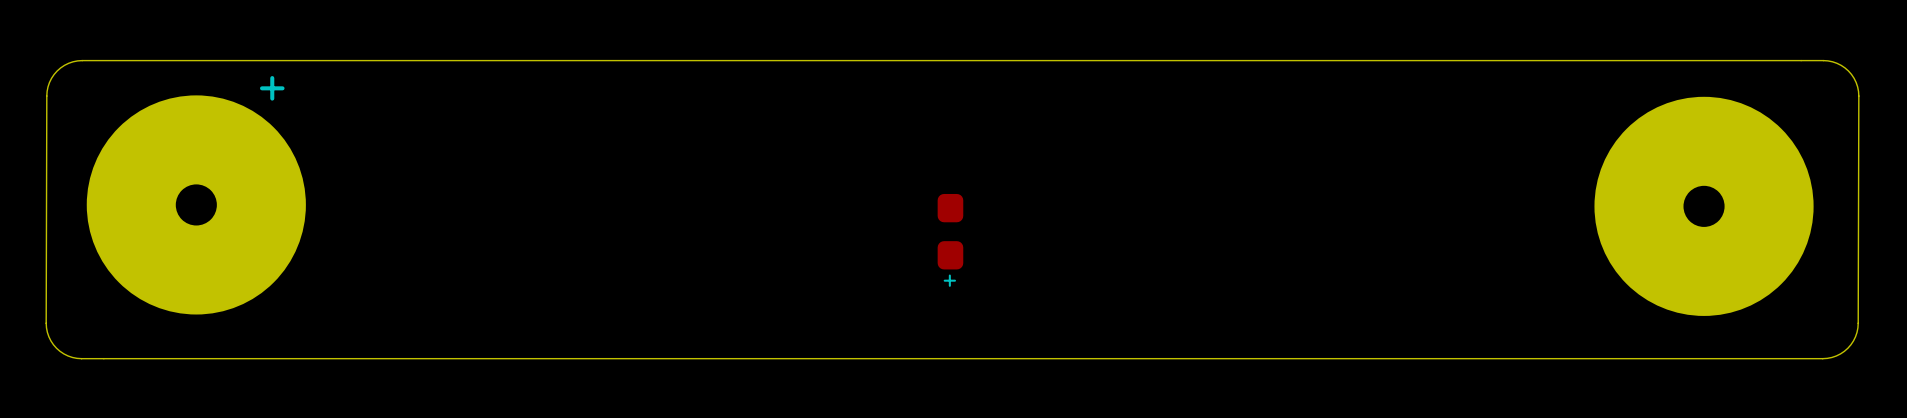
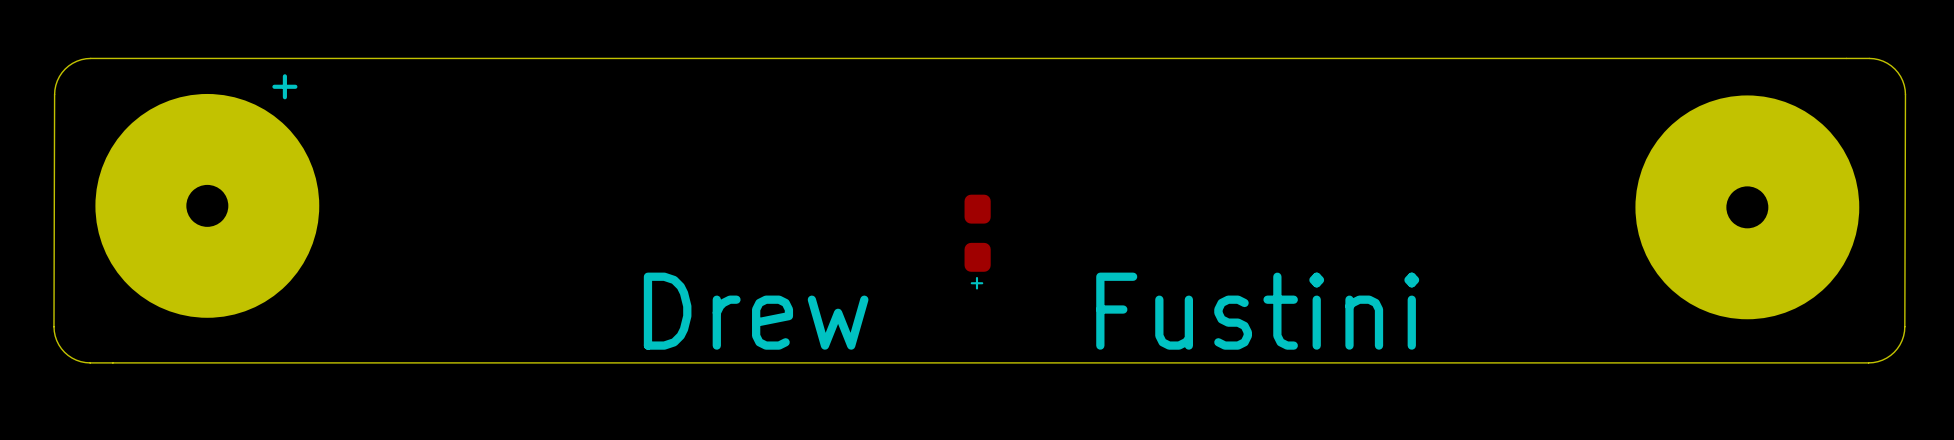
text: none -> Drew Fustini (1031, 311)

